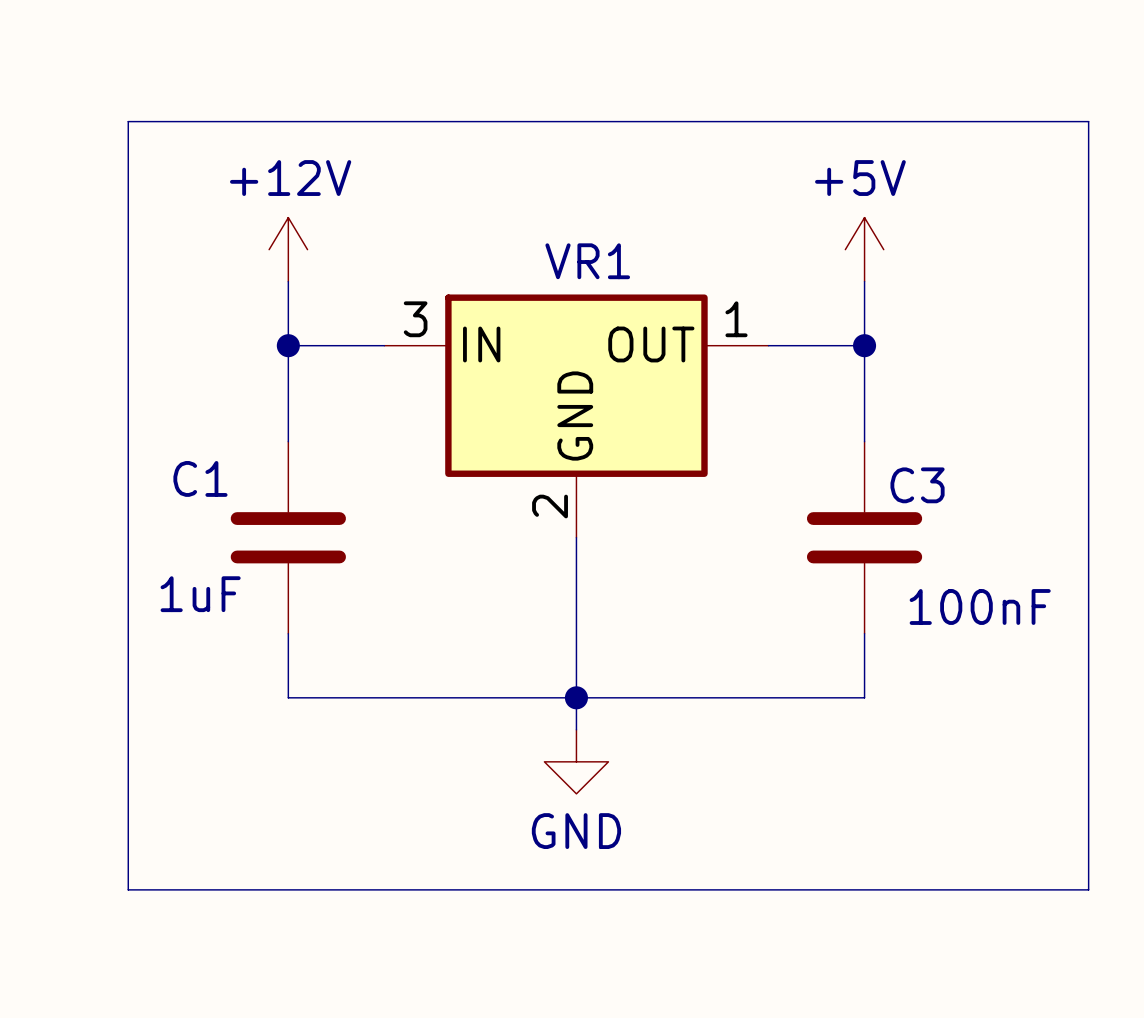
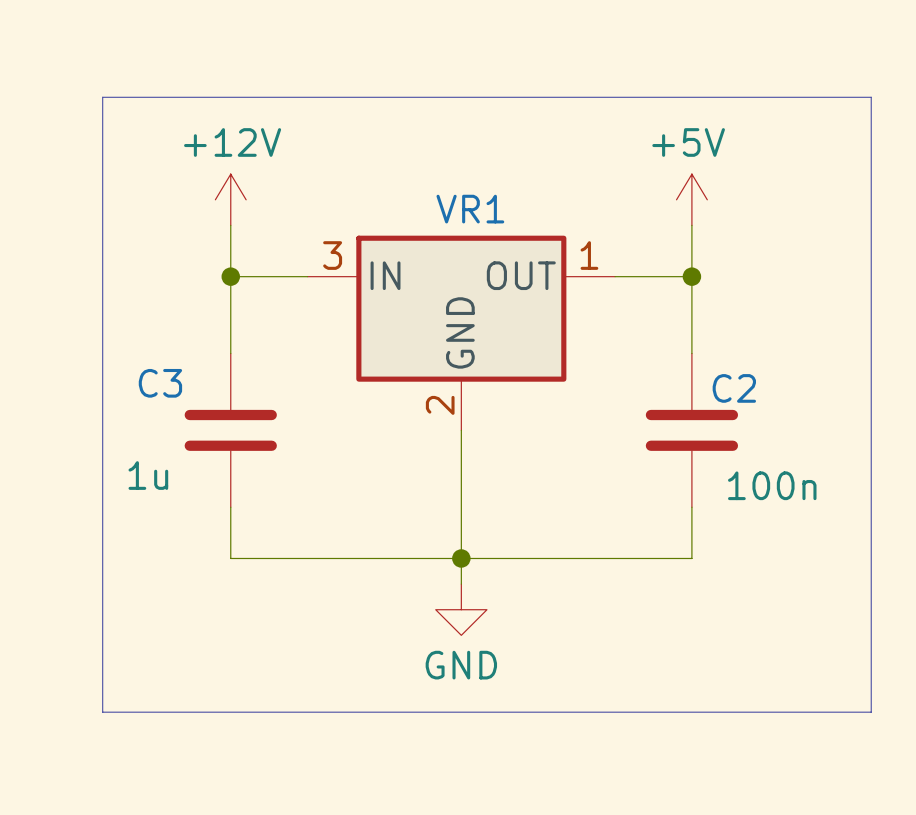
C1 name: C1 (200, 478) -> C3 (160, 383)
C3 name: C3 (917, 485) -> C2 (734, 388)
C1 value: 1uF (200, 594) -> 1u (148, 475)
C3 value: 100nF (980, 606) -> 100n (772, 485)

